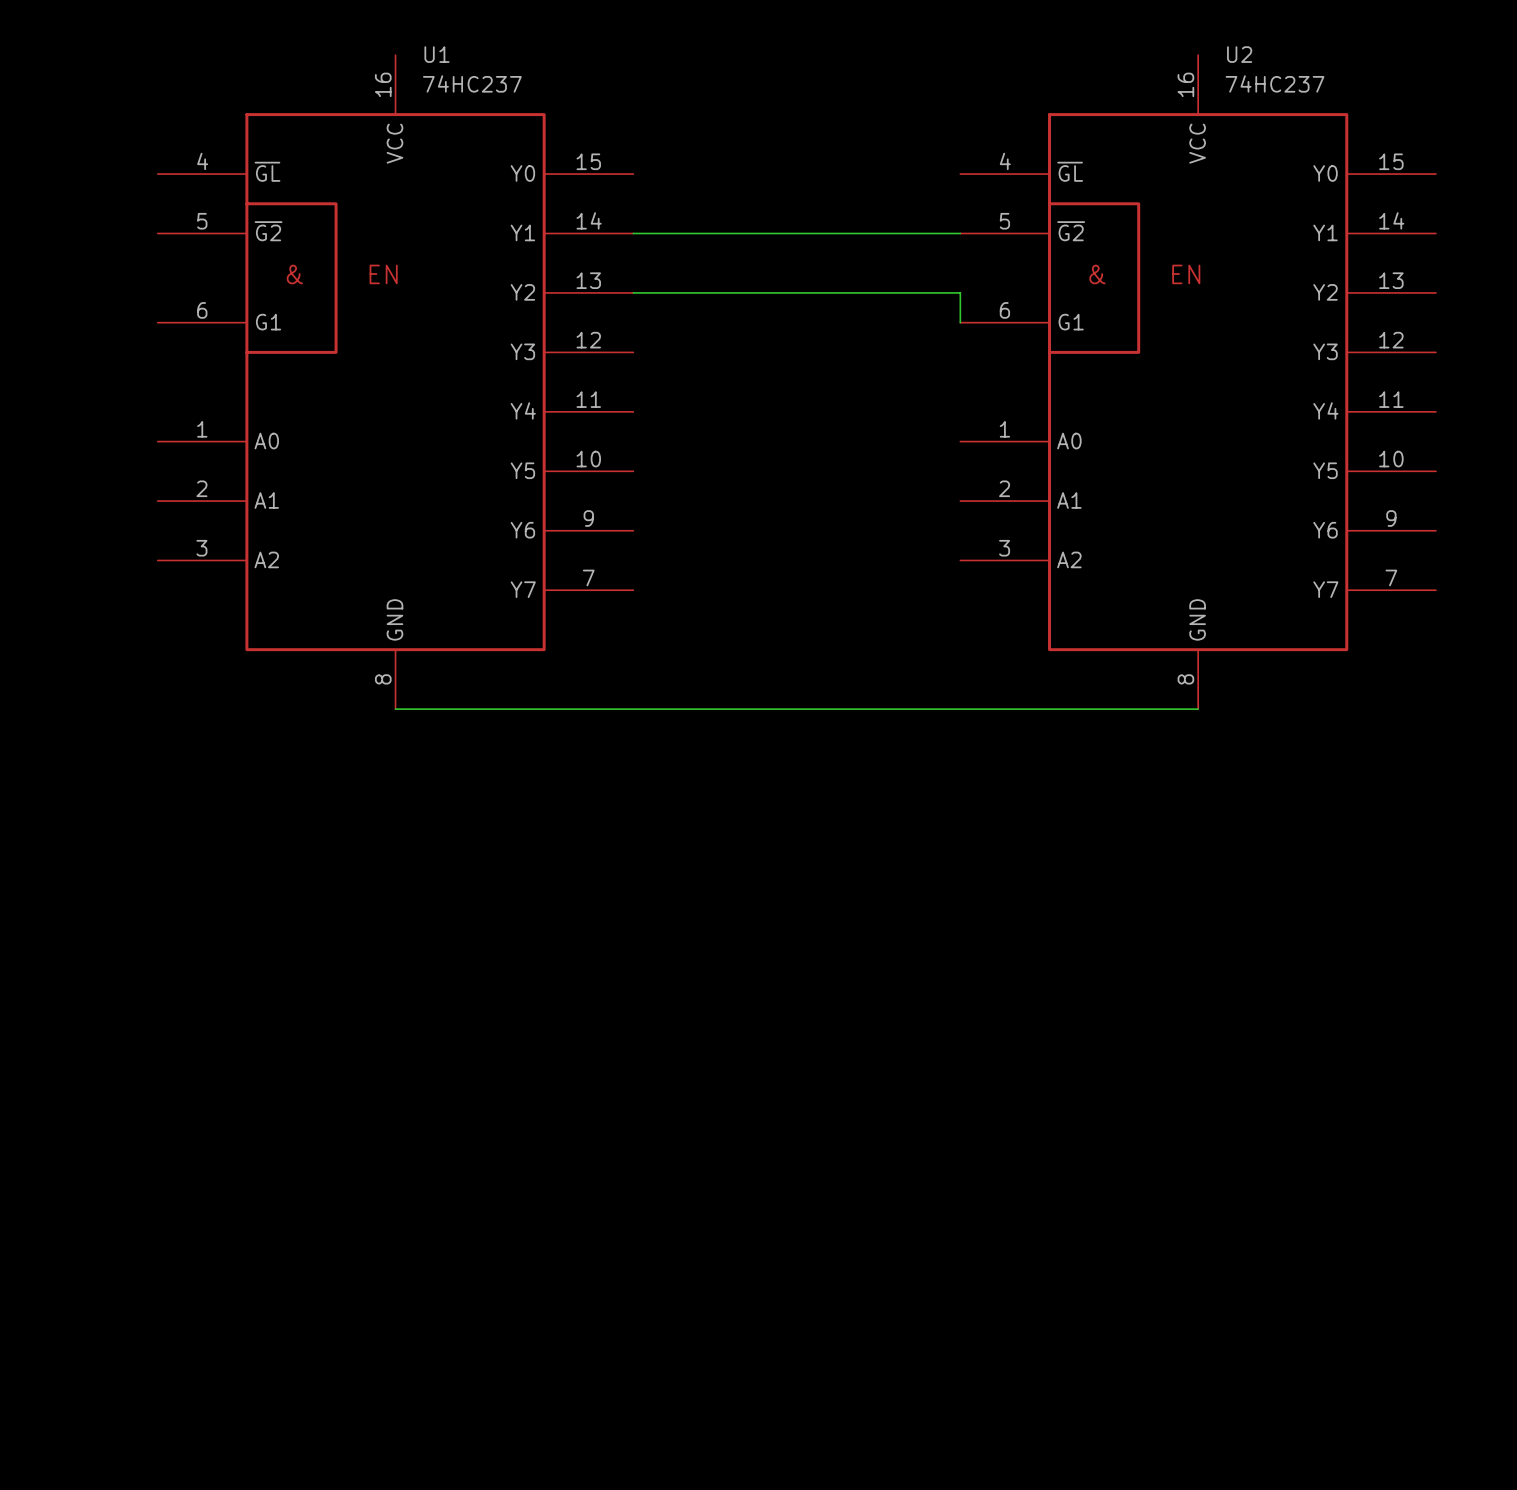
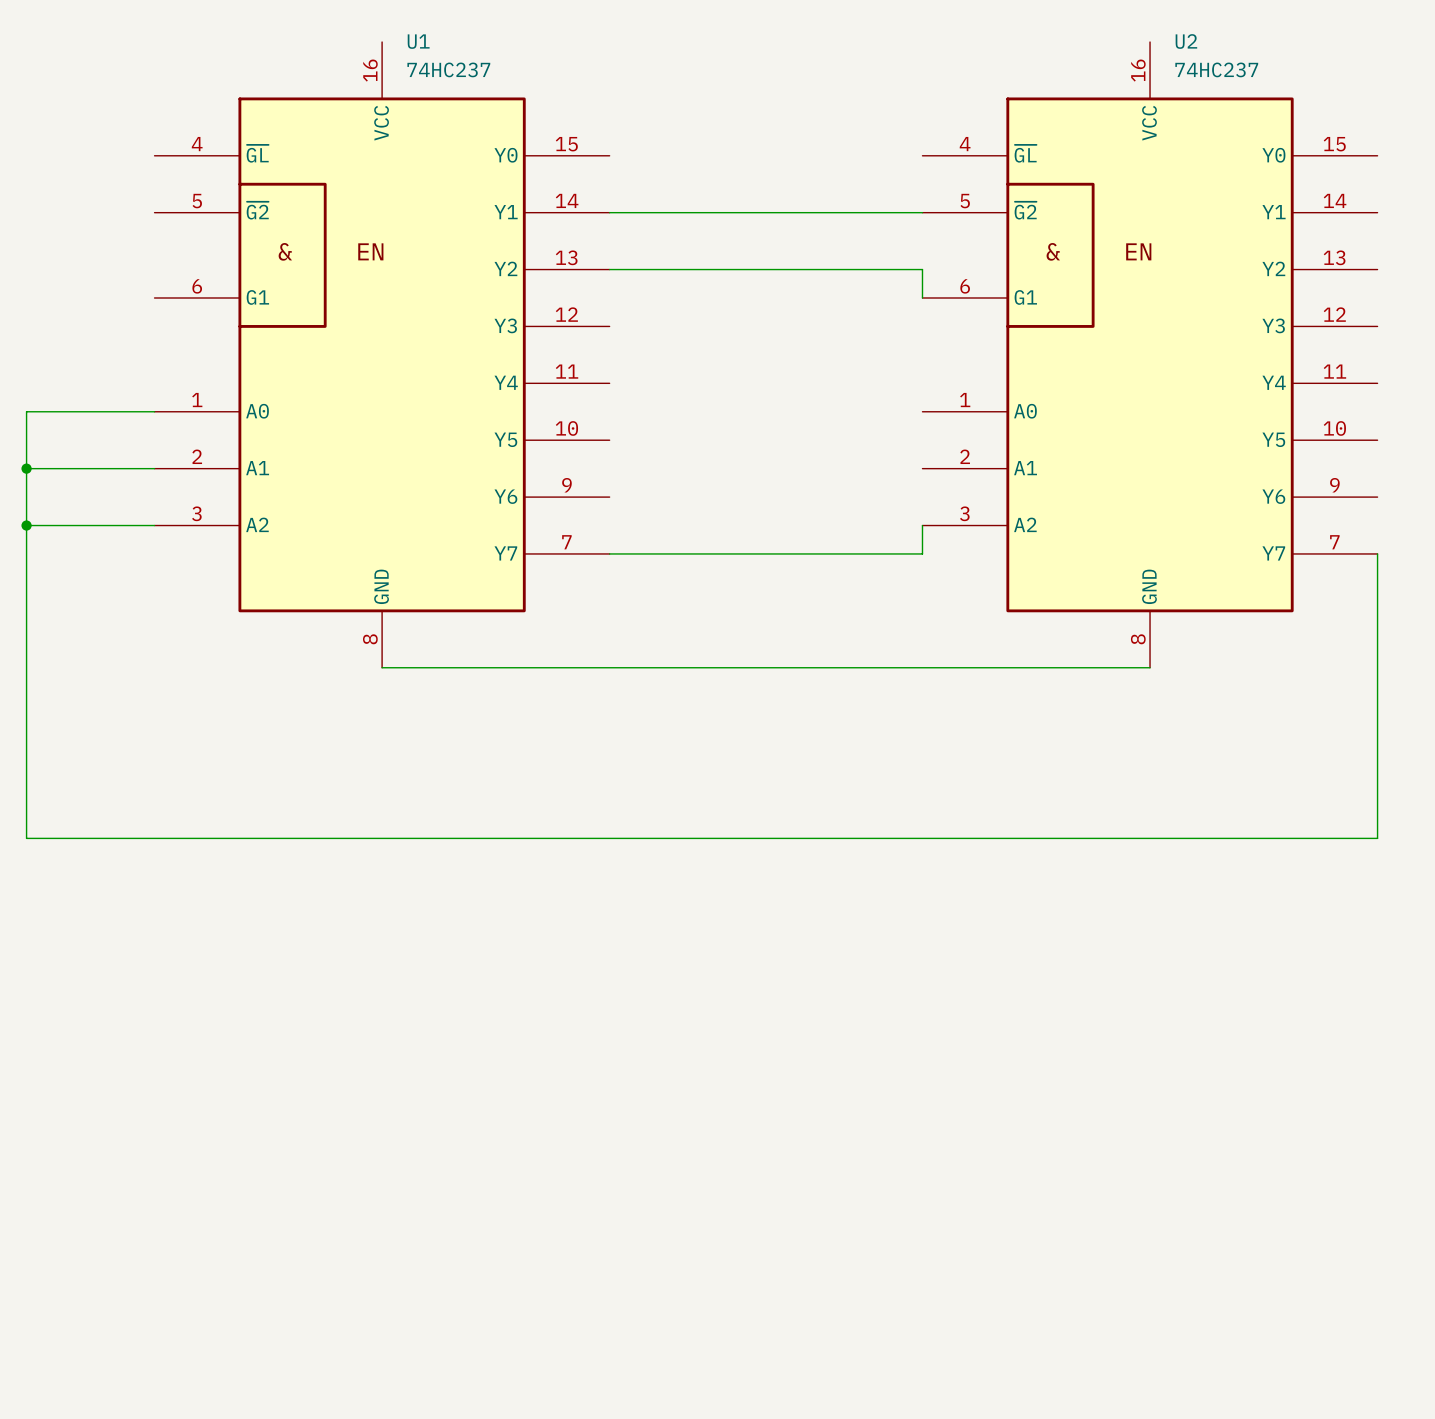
wire: none -> (154, 411) (26, 411) (26, 838) (1377, 838) (1377, 553)
wire: none -> (26, 468) (154, 468)
junction: none -> (26, 468)
wire: none -> (26, 525) (154, 525)
junction: none -> (26, 525)
wire: none -> (922, 525) (922, 553) (609, 553)

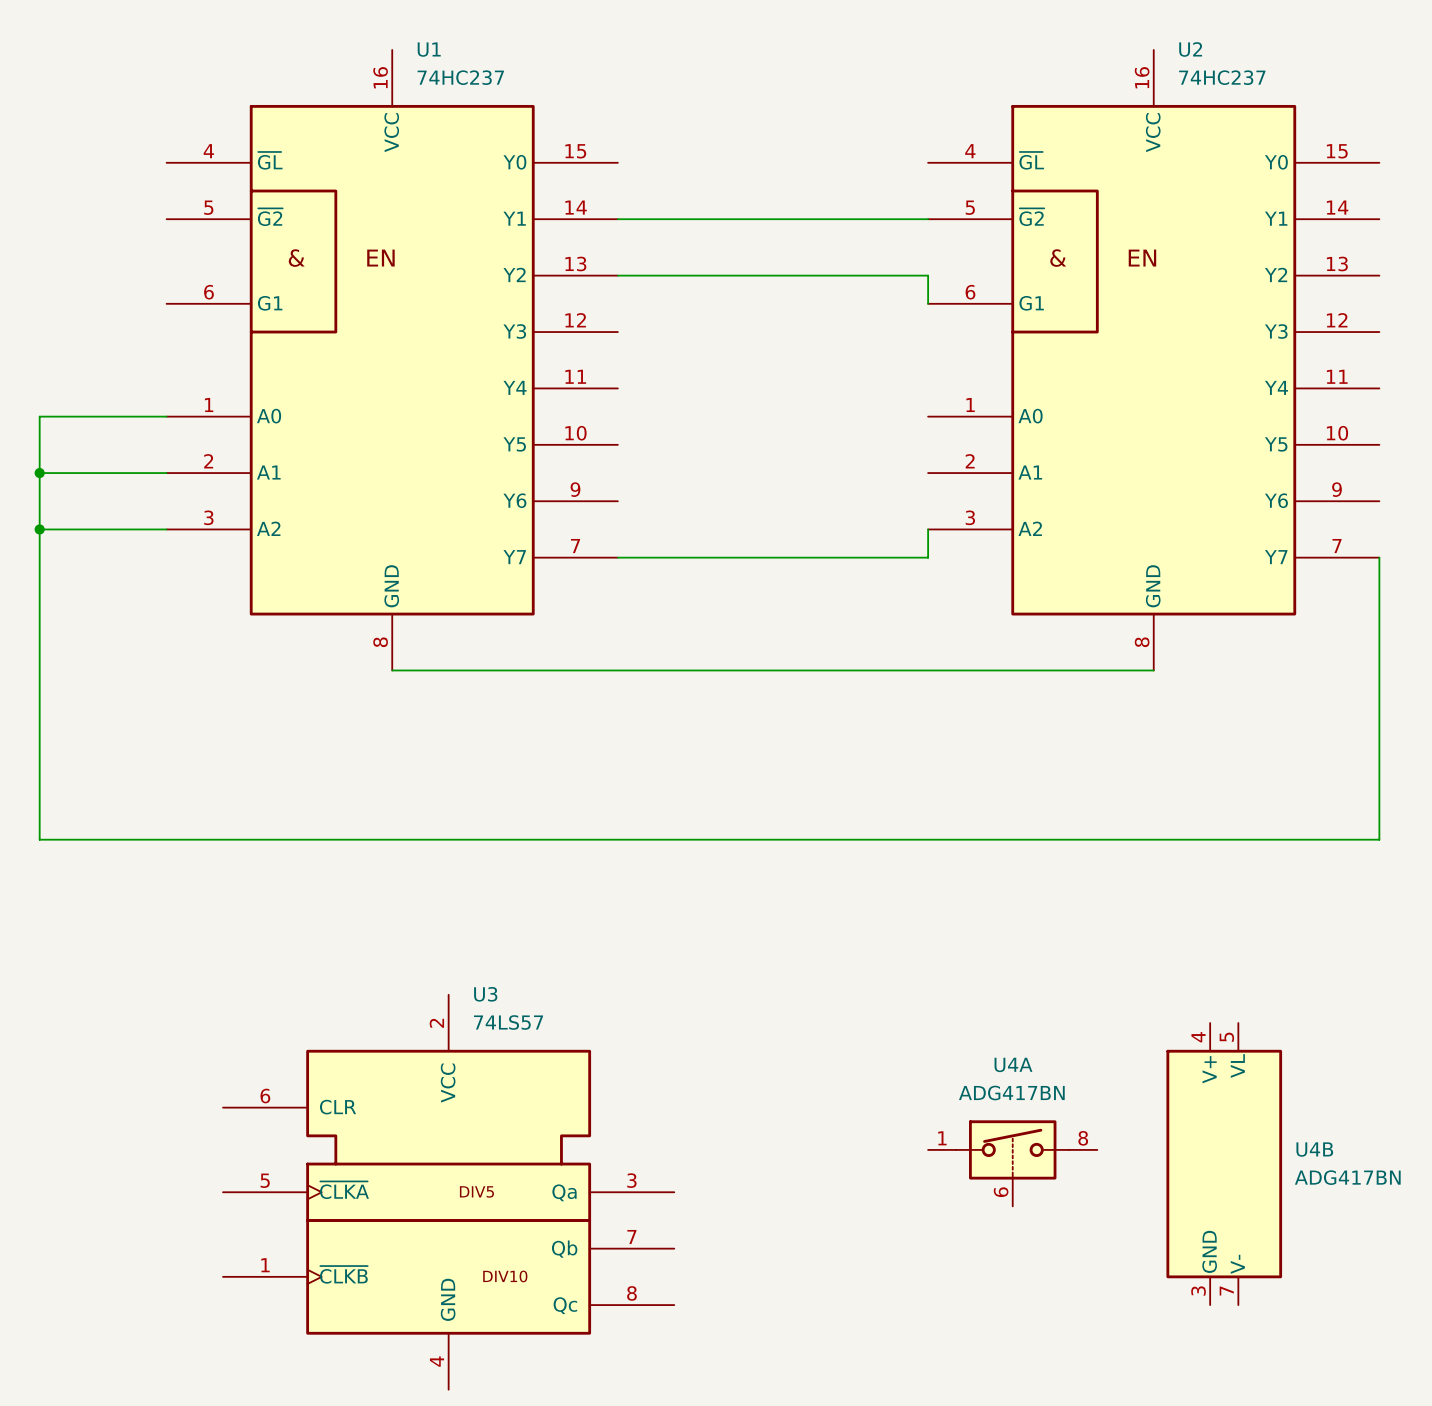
U4A: none -> ADG417BN (1012, 1163)
U4B: none -> ADG417BN (1224, 1164)
U3: none -> 74LS57 (448, 1192)

